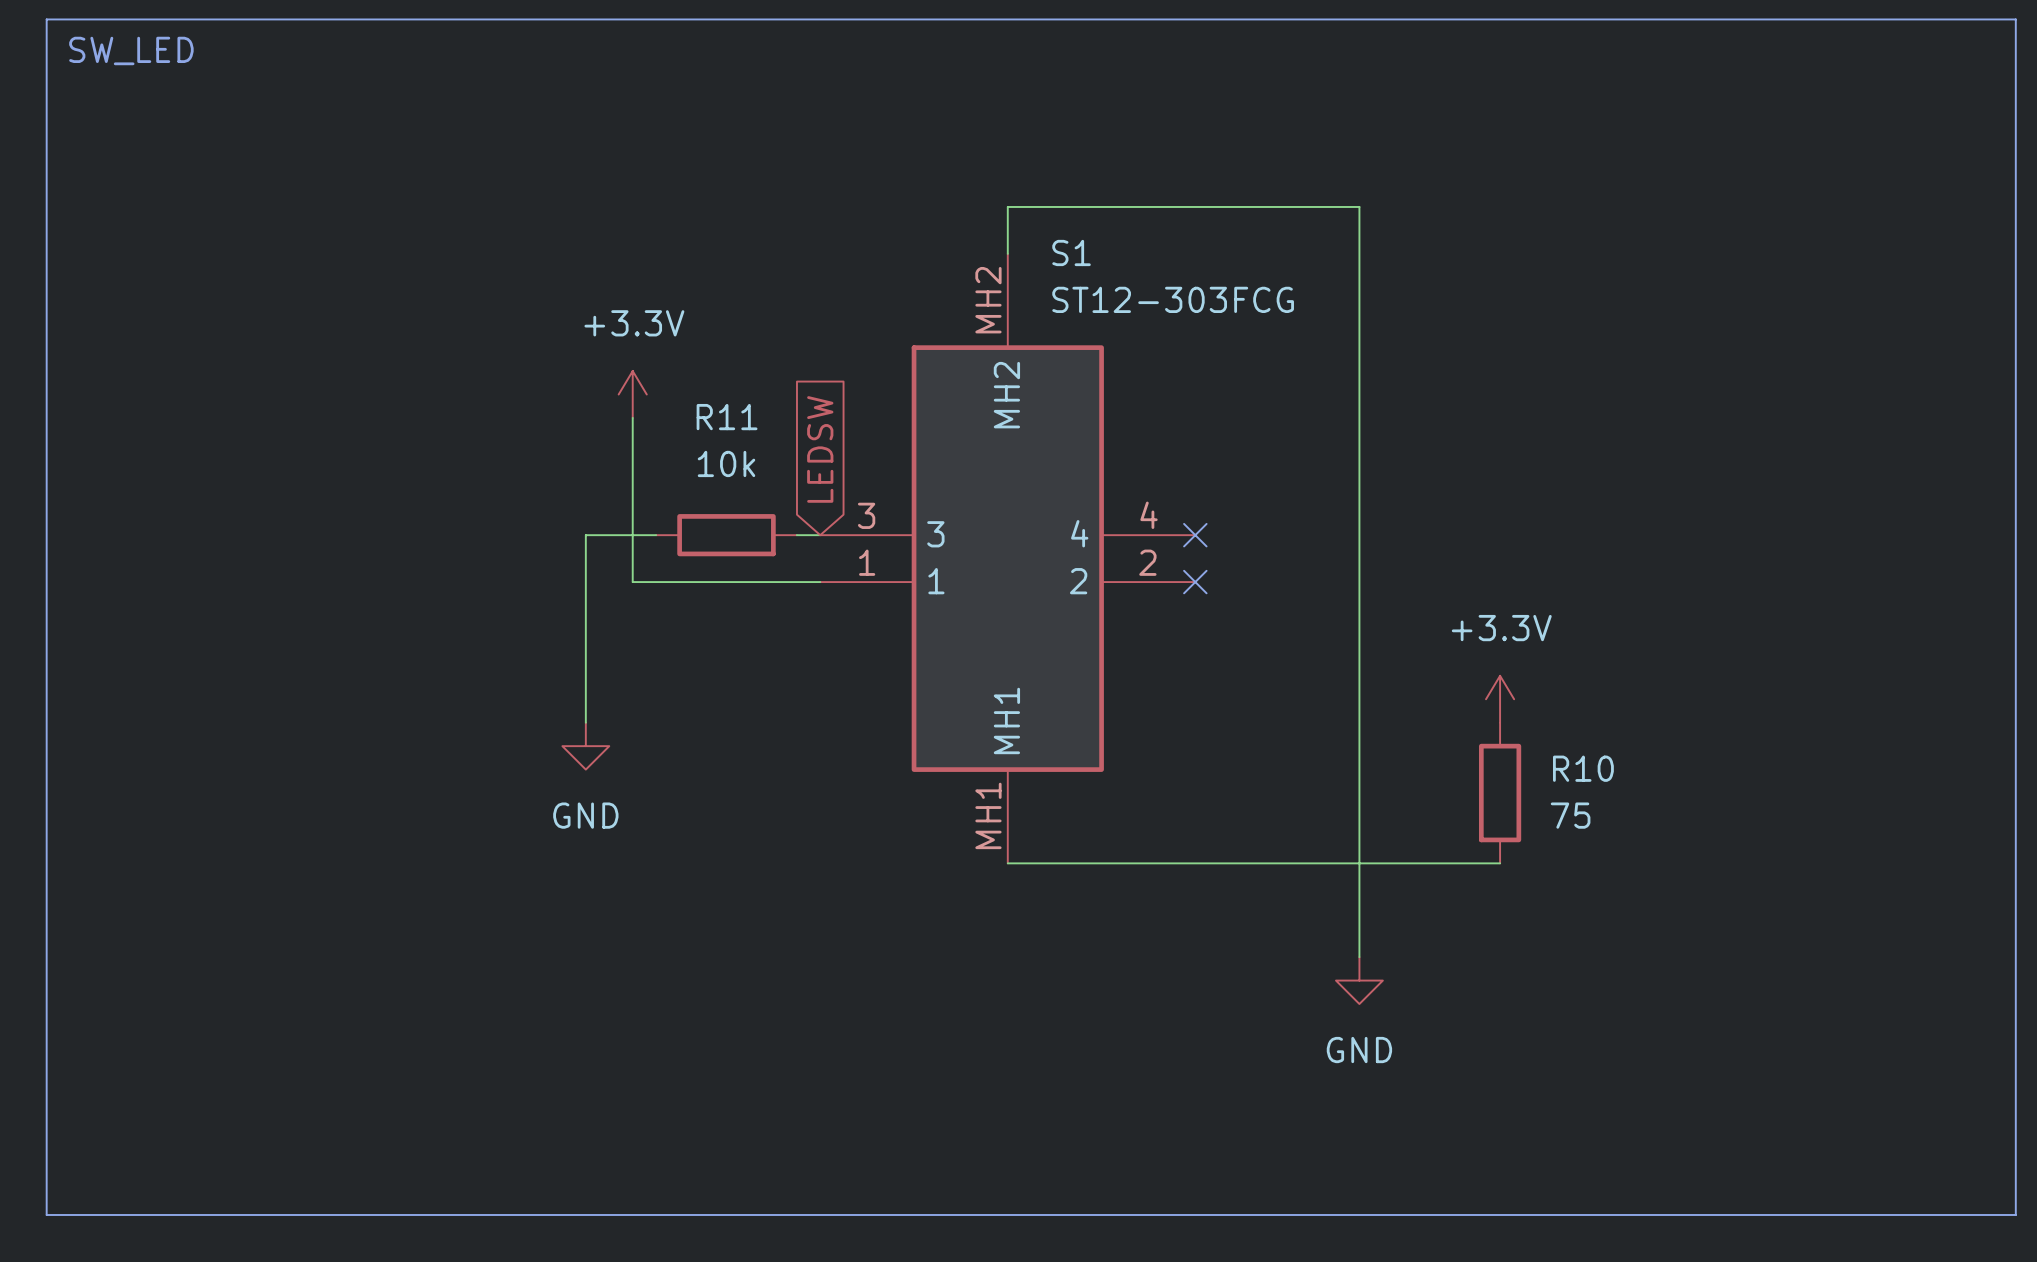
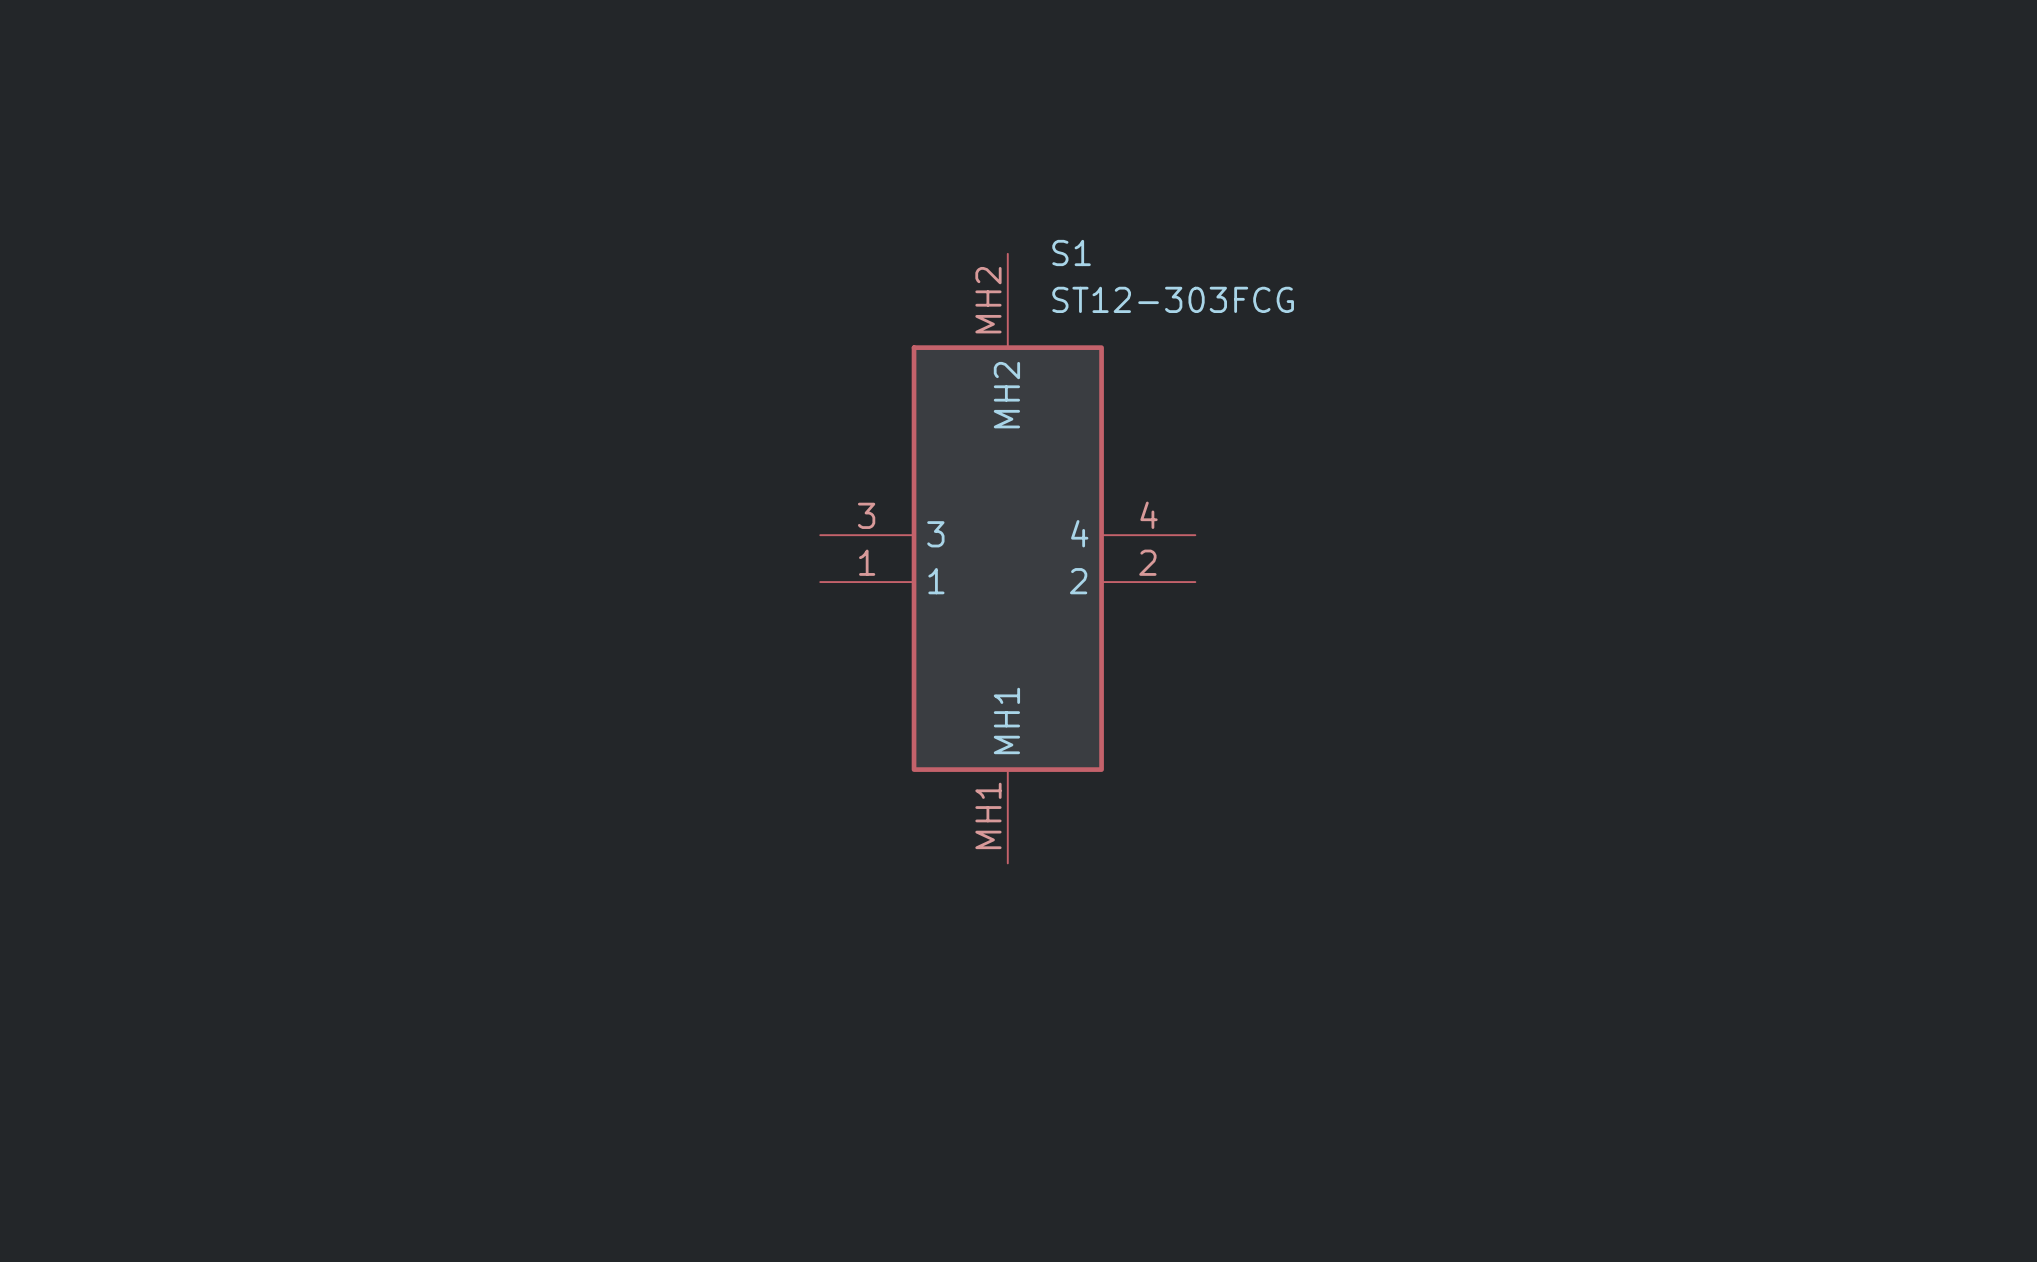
line: (46, 19) (2015, 19) (2015, 1214) (46, 1214) (46, 19) -> none
text: SW_LED (131, 50) -> none
wire: (1007, 253) (1007, 206) (1359, 206) (1359, 957) -> none
power symbol: +3.3V (632, 394) -> none
wire: (632, 417) (632, 582) (820, 582) -> none
global label: LEDSW (820, 449) -> none
wire: (656, 535) (585, 535) (585, 722) -> none
R11: 10k (726, 535) -> none
wire: (796, 535) (820, 535) -> none
no-connect mark: (1195, 535) -> none
no-connect mark: (1195, 582) -> none
power symbol: +3.3V (1500, 699) -> none
power symbol: GND (585, 746) -> none
R10: 75 (1500, 793) -> none
wire: (1007, 863) (1500, 863) -> none
power symbol: GND (1359, 980) -> none

